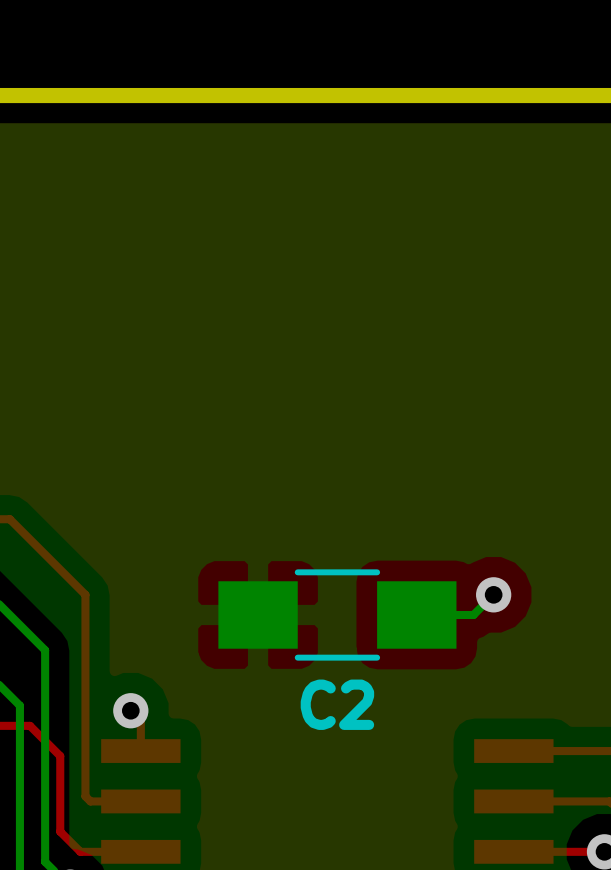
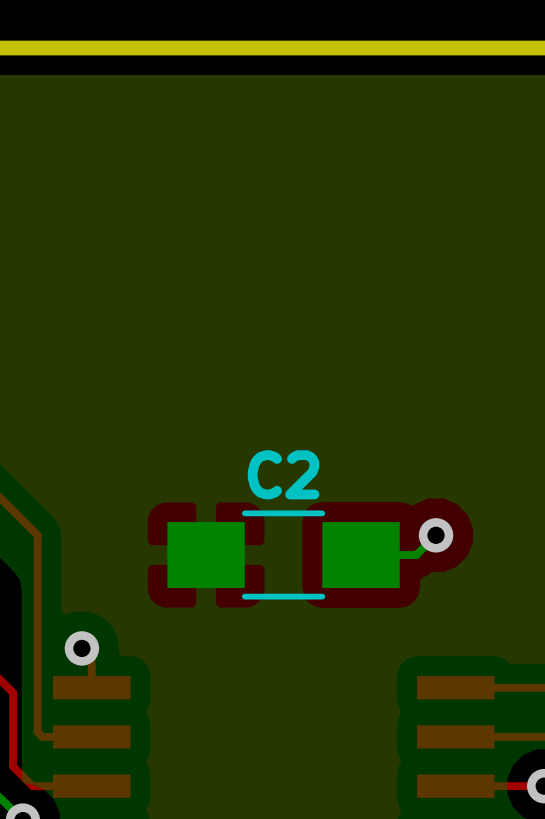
C2 name position: C2 (337, 704) -> C2 (283, 474)

